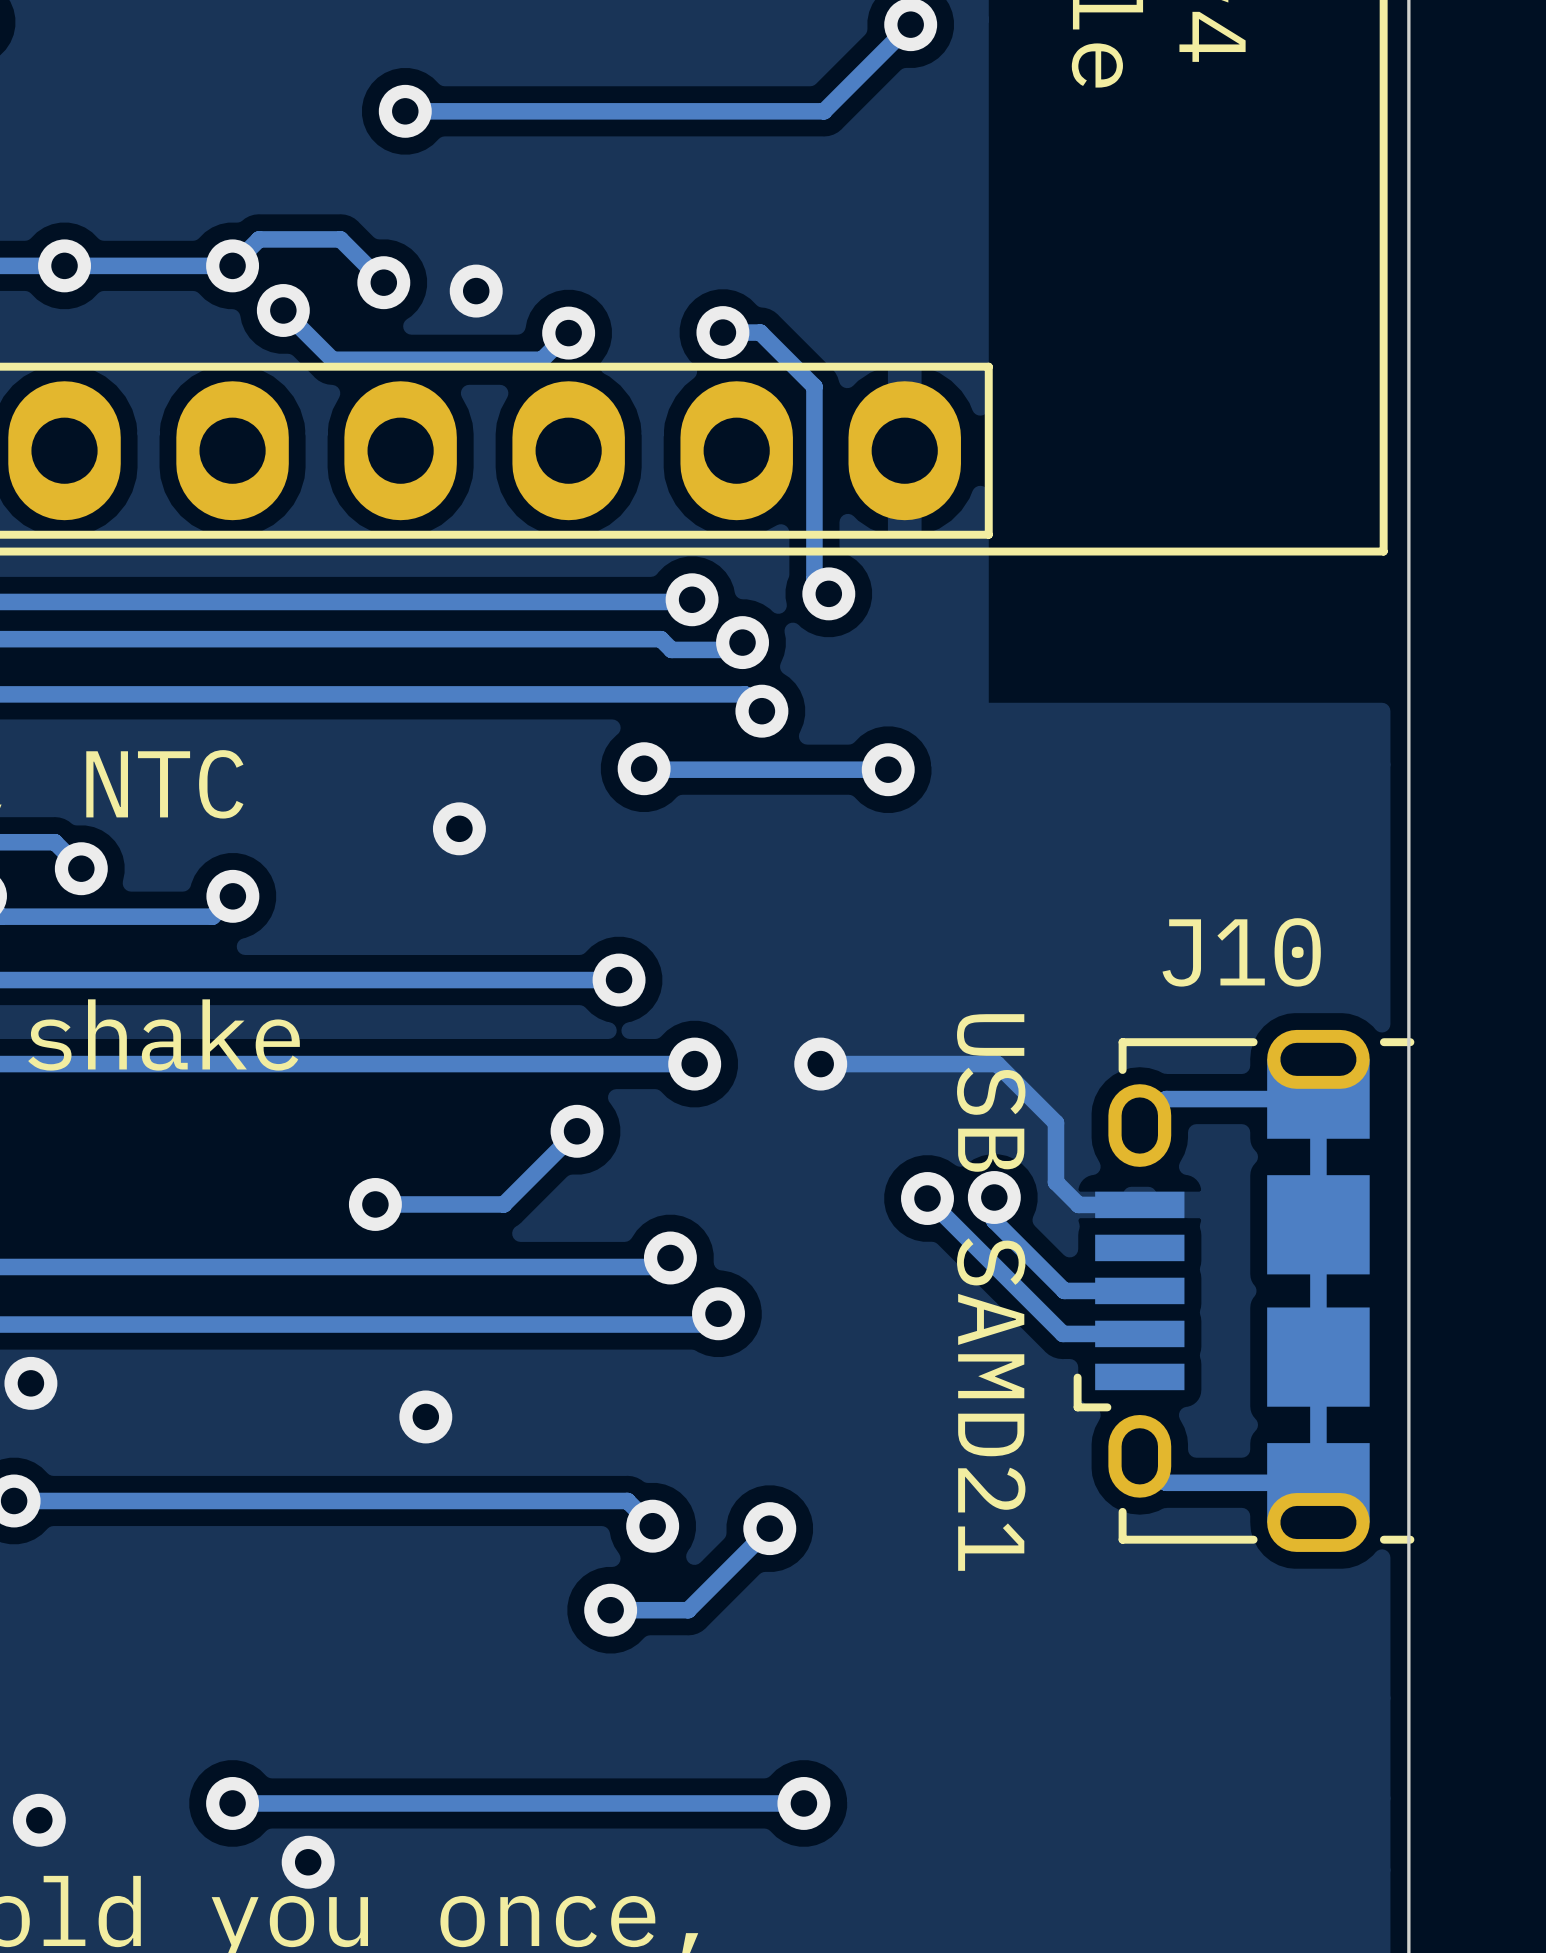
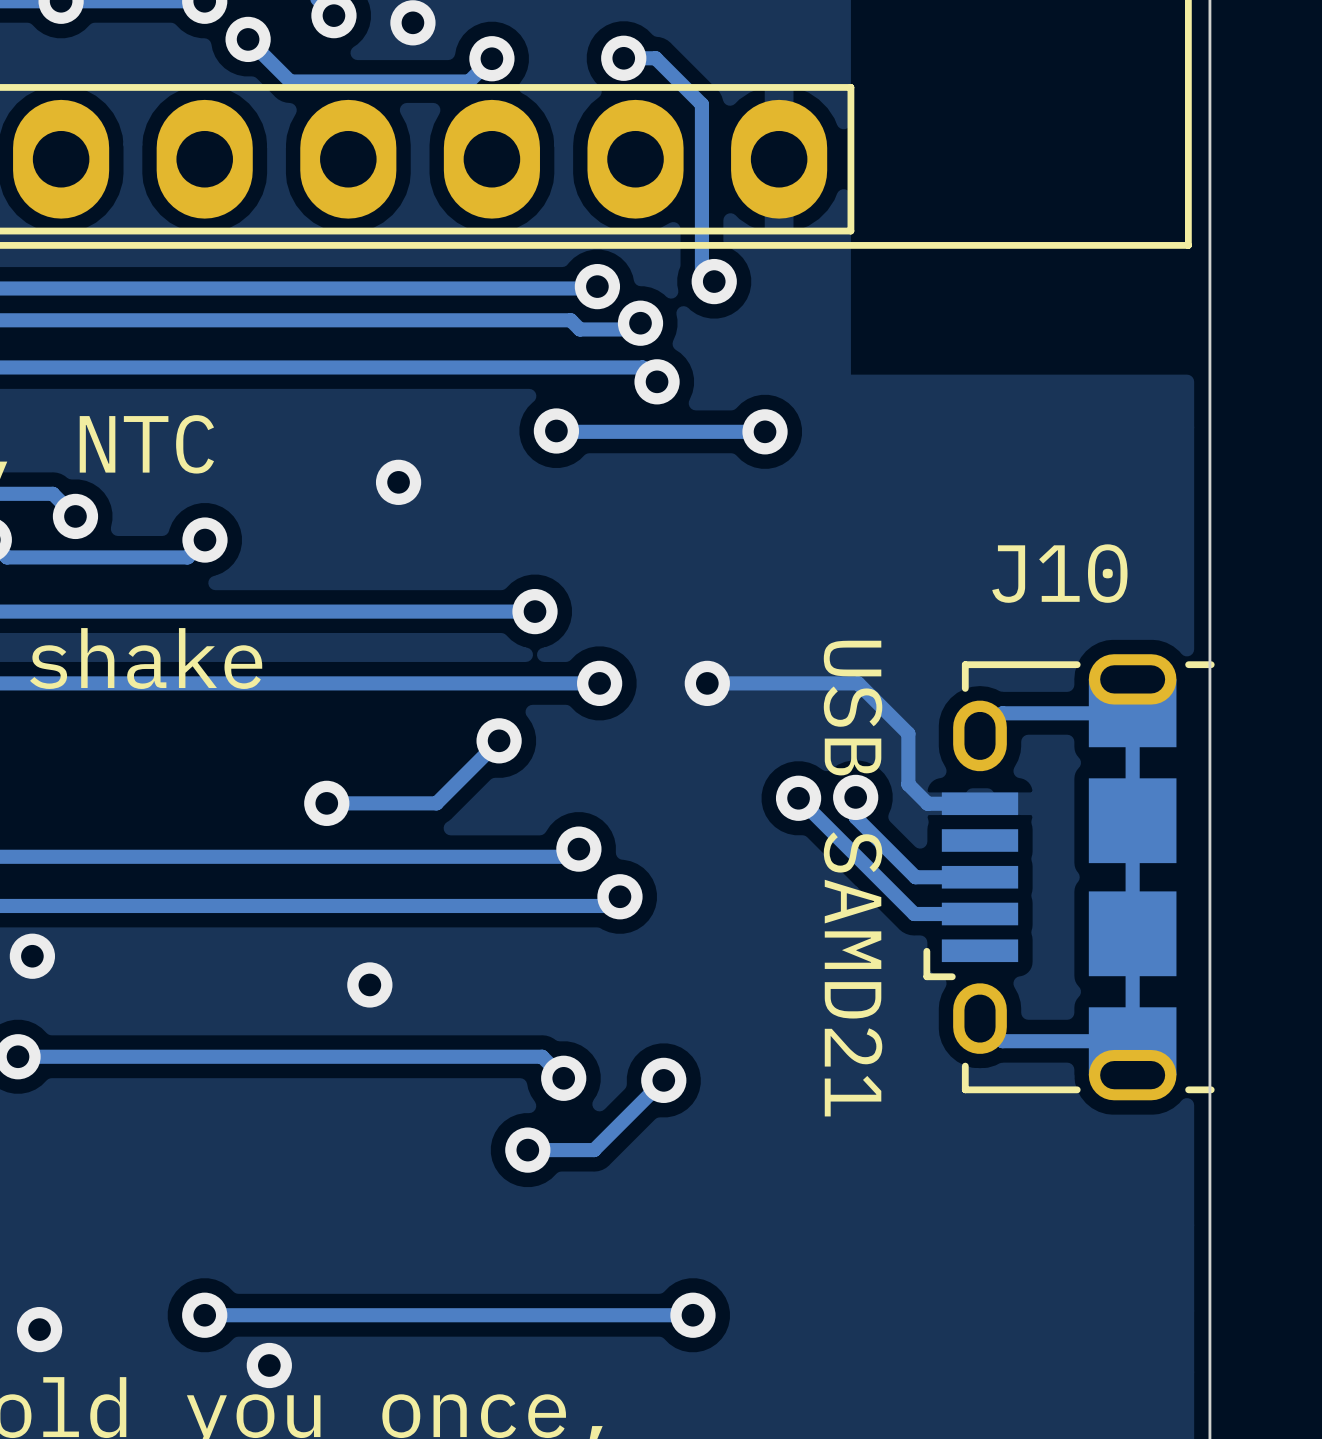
J10 name position: J10 (1241, 952) -> J10 (1059, 573)

